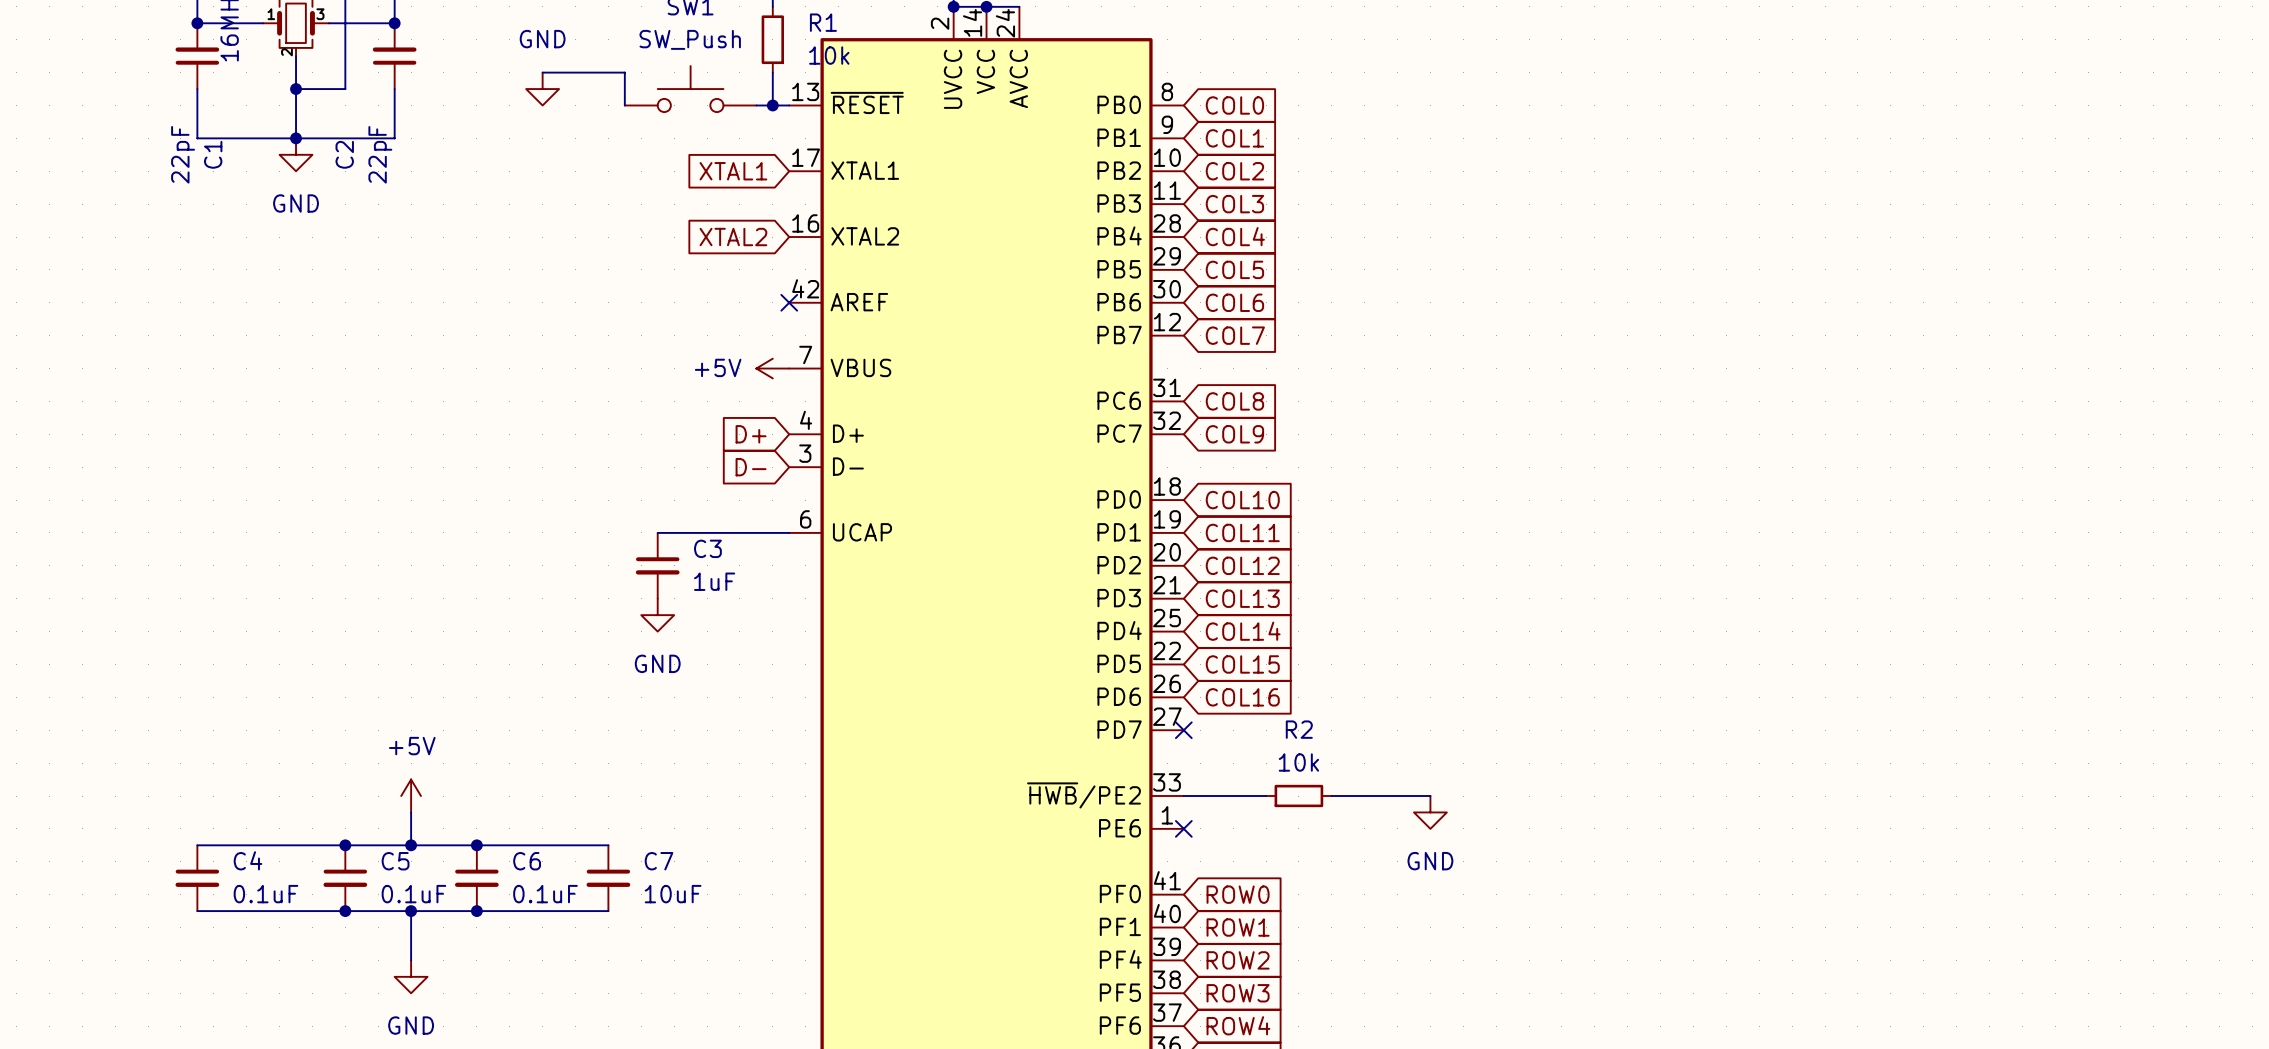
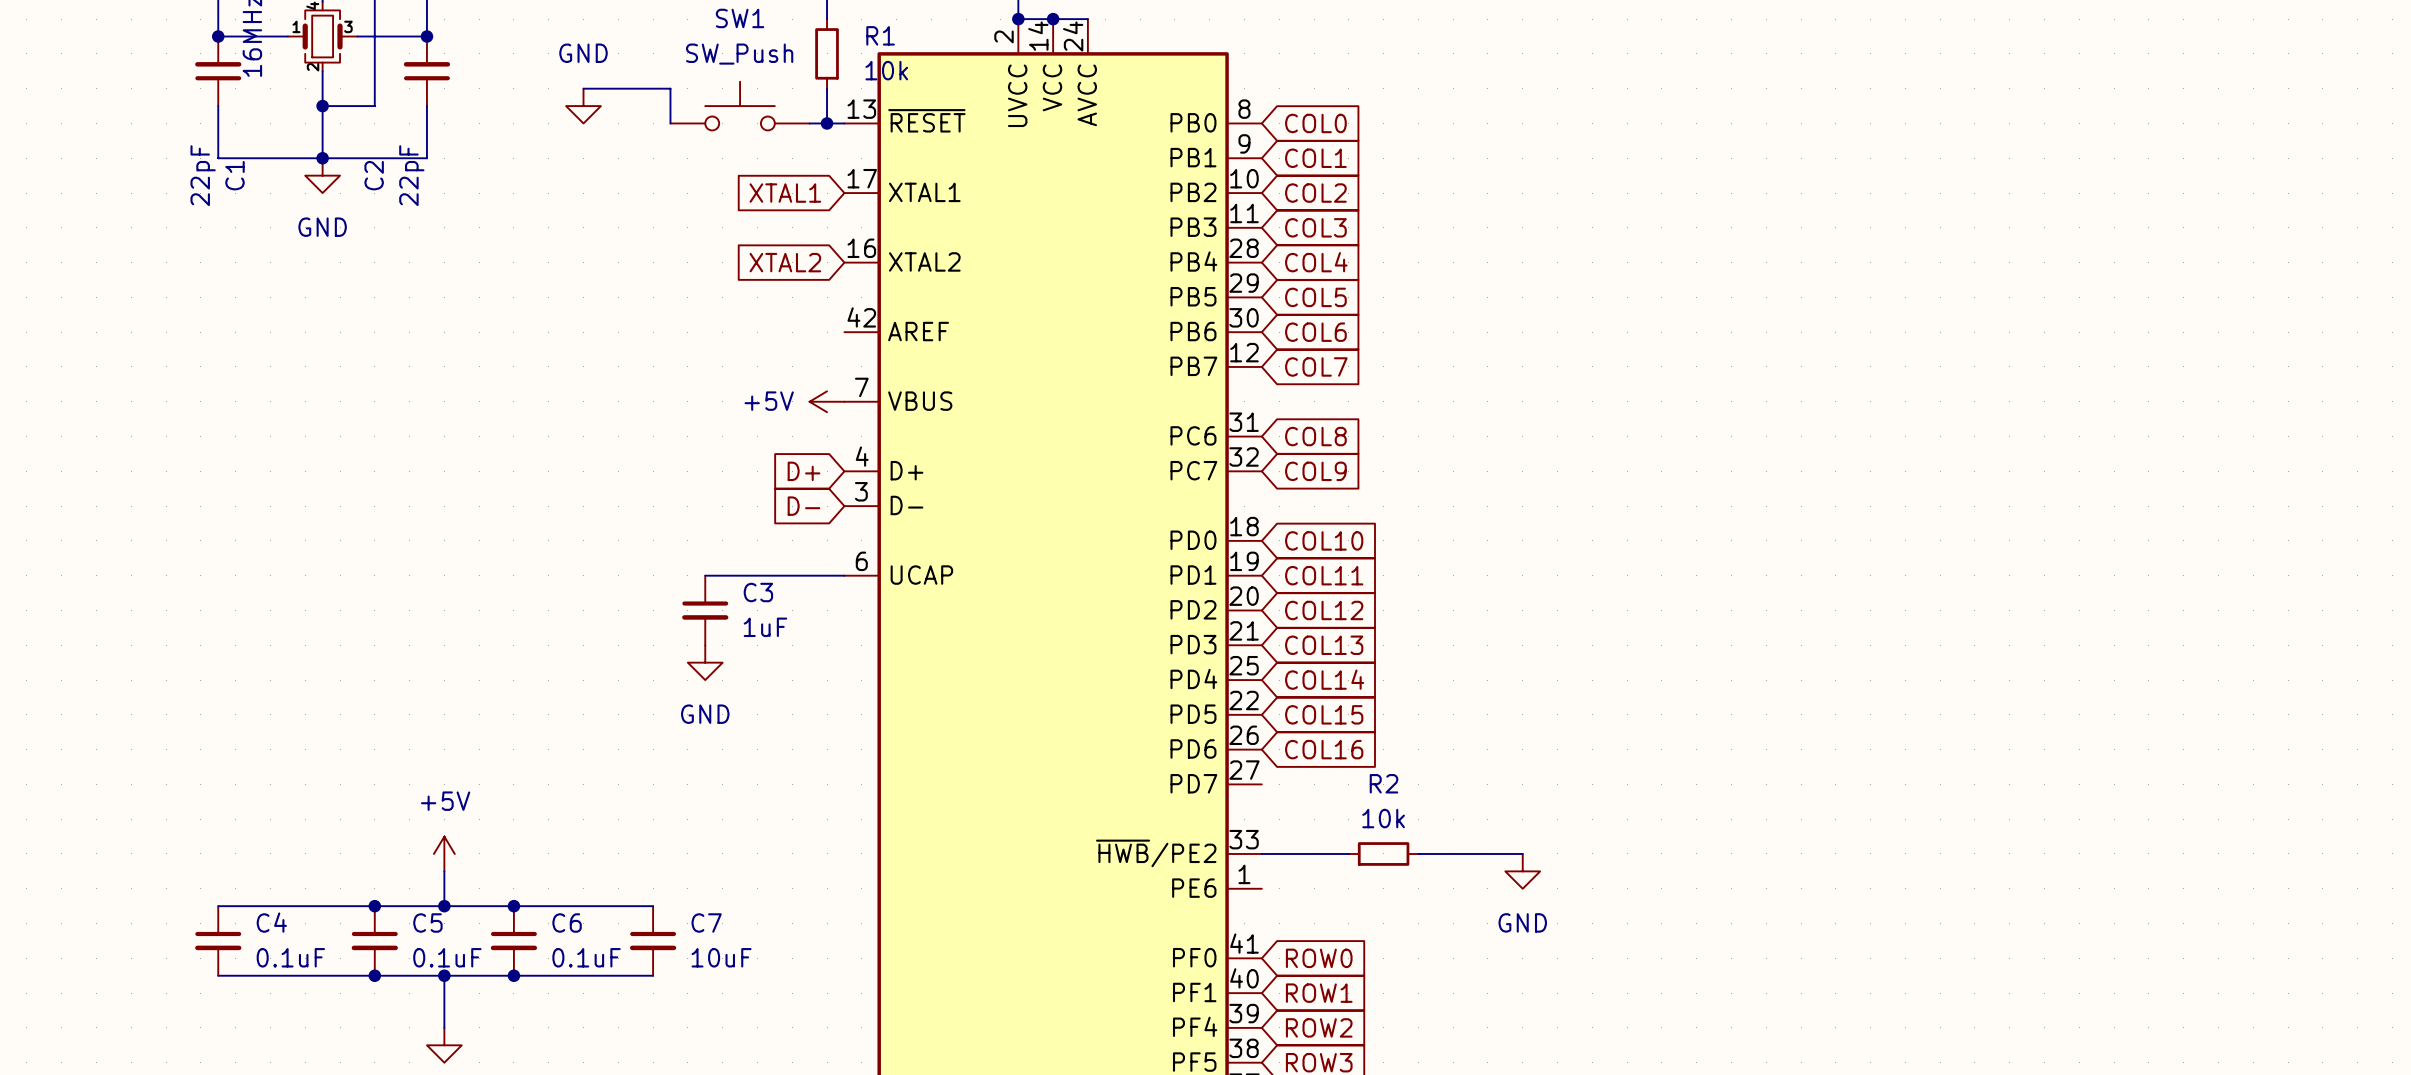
no-connect mark: (789, 302) -> none
no-connect mark: (1183, 730) -> none
no-connect mark: (1183, 828) -> none

